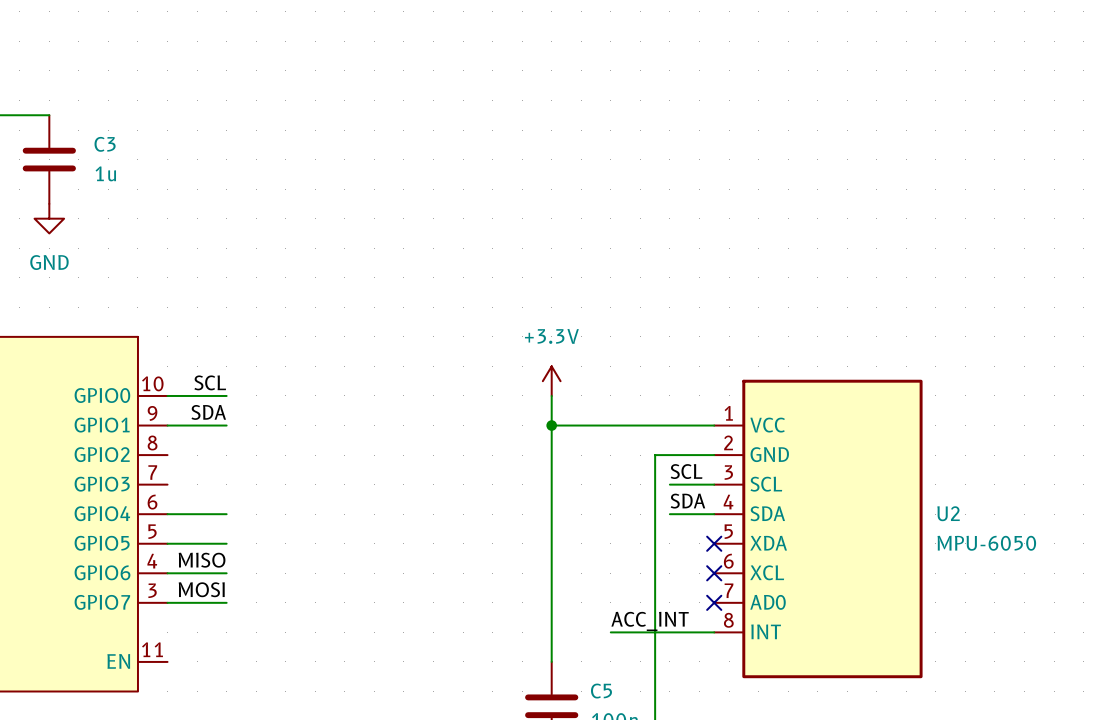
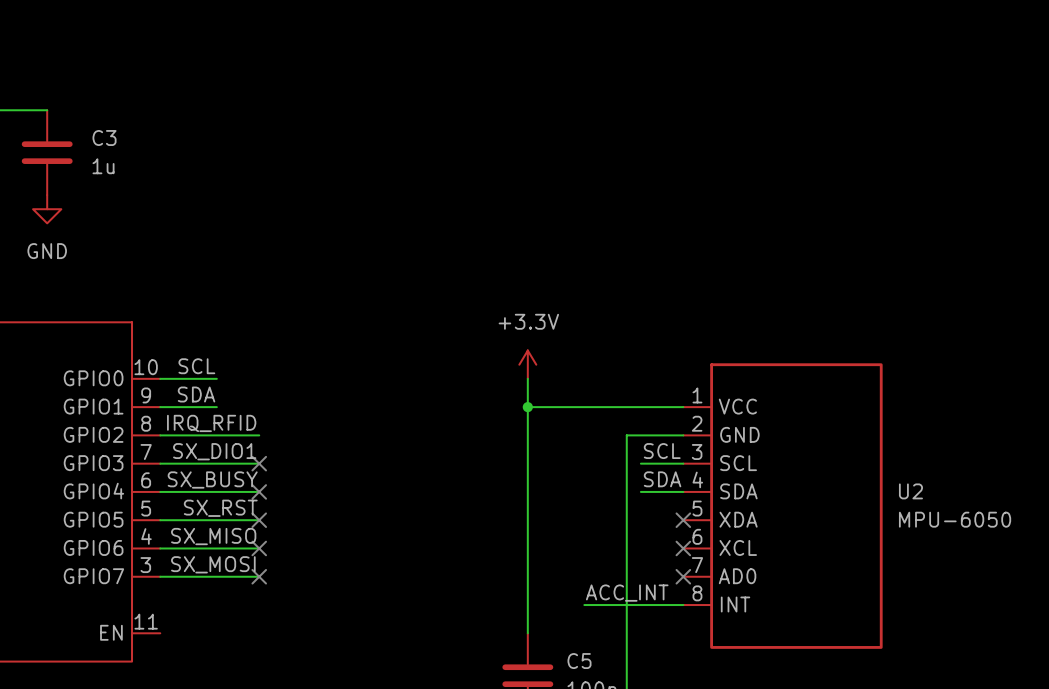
label: none -> IRQ_RFID (211, 423)
wire: none -> (160, 435) (259, 435)
label: none -> SX_DIO1 (214, 451)
wire: none -> (160, 463) (259, 463)
no-connect mark: none -> (259, 463)
label: none -> SX_BUSY (212, 479)
wire: none -> (216, 491) (259, 491)
no-connect mark: none -> (259, 491)
label: none -> SX_RST (220, 508)
wire: none -> (216, 520) (259, 520)
no-connect mark: none -> (259, 520)
label: MISO (202, 560) -> SX_MISO (213, 536)
wire: none -> (216, 548) (259, 548)
no-connect mark: none -> (259, 548)
label: MOSI (201, 589) -> SX_MOSI (213, 564)
wire: none -> (216, 576) (259, 576)
no-connect mark: none -> (259, 576)

